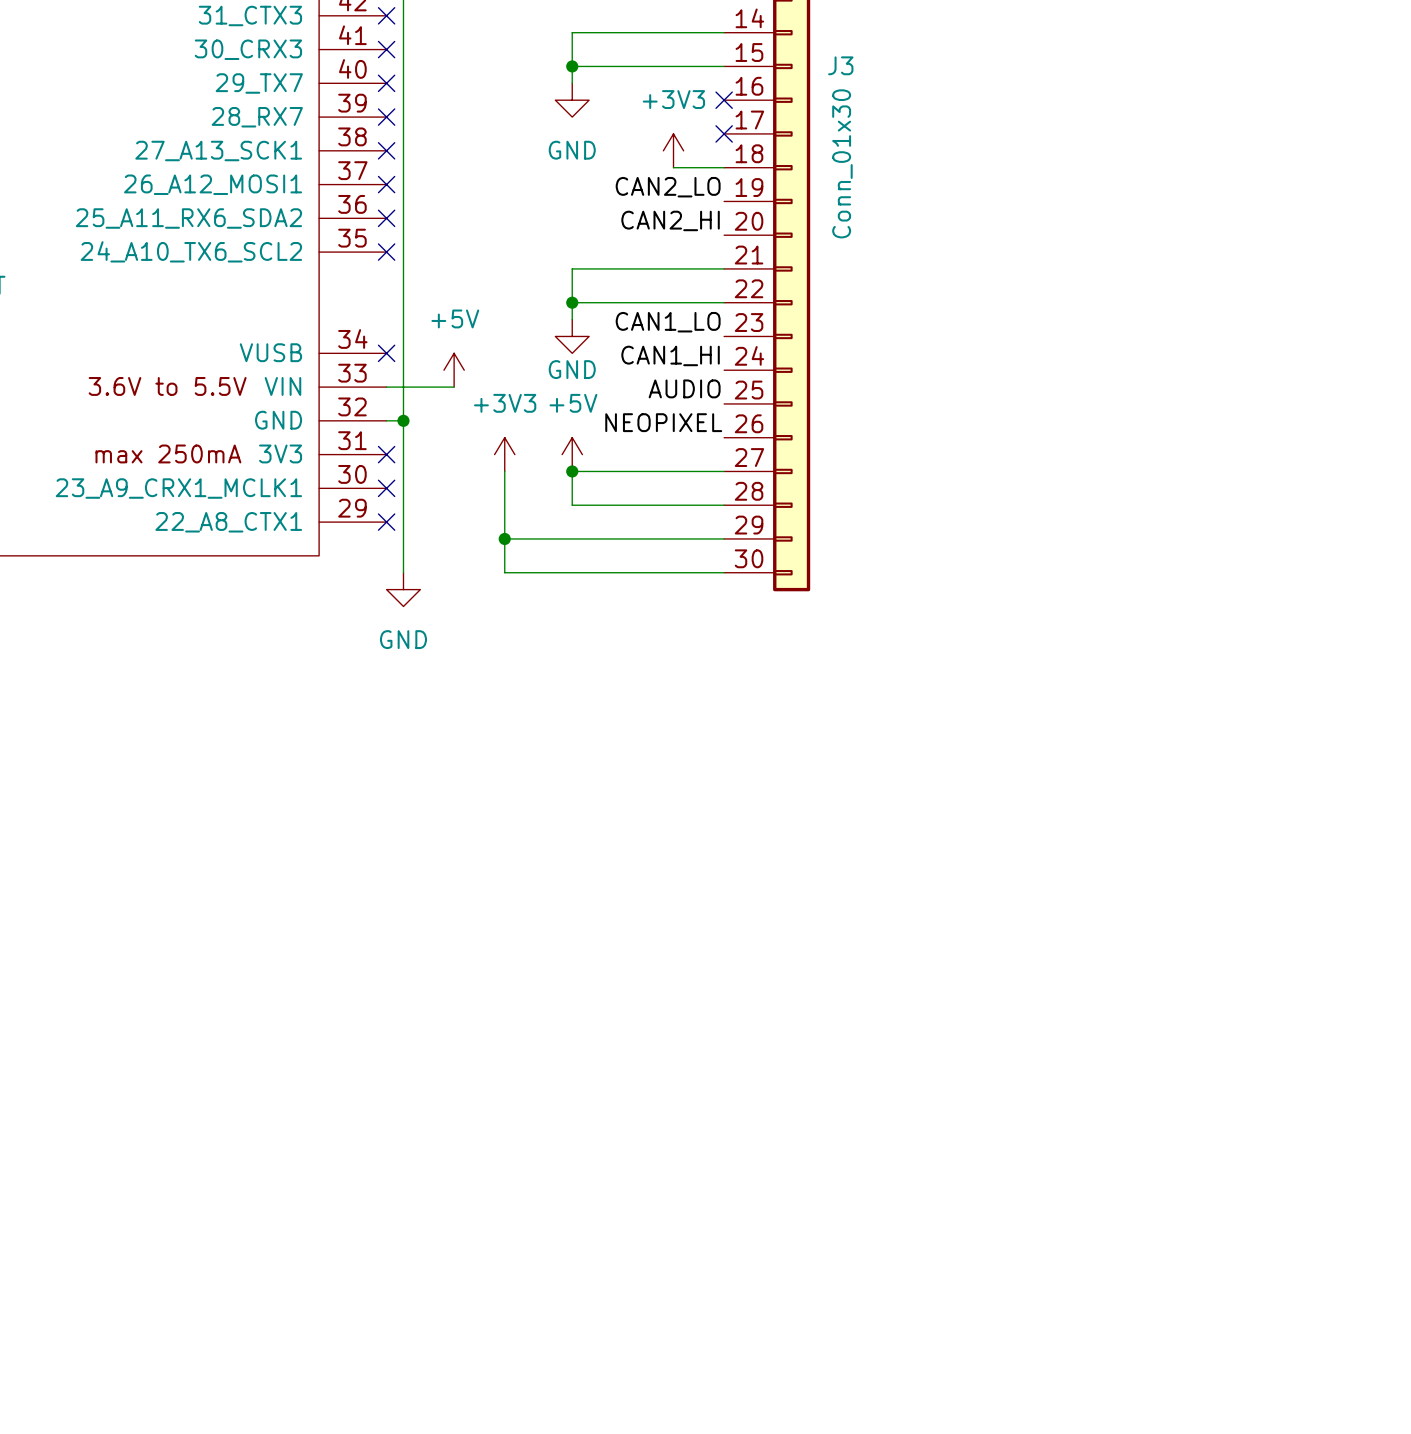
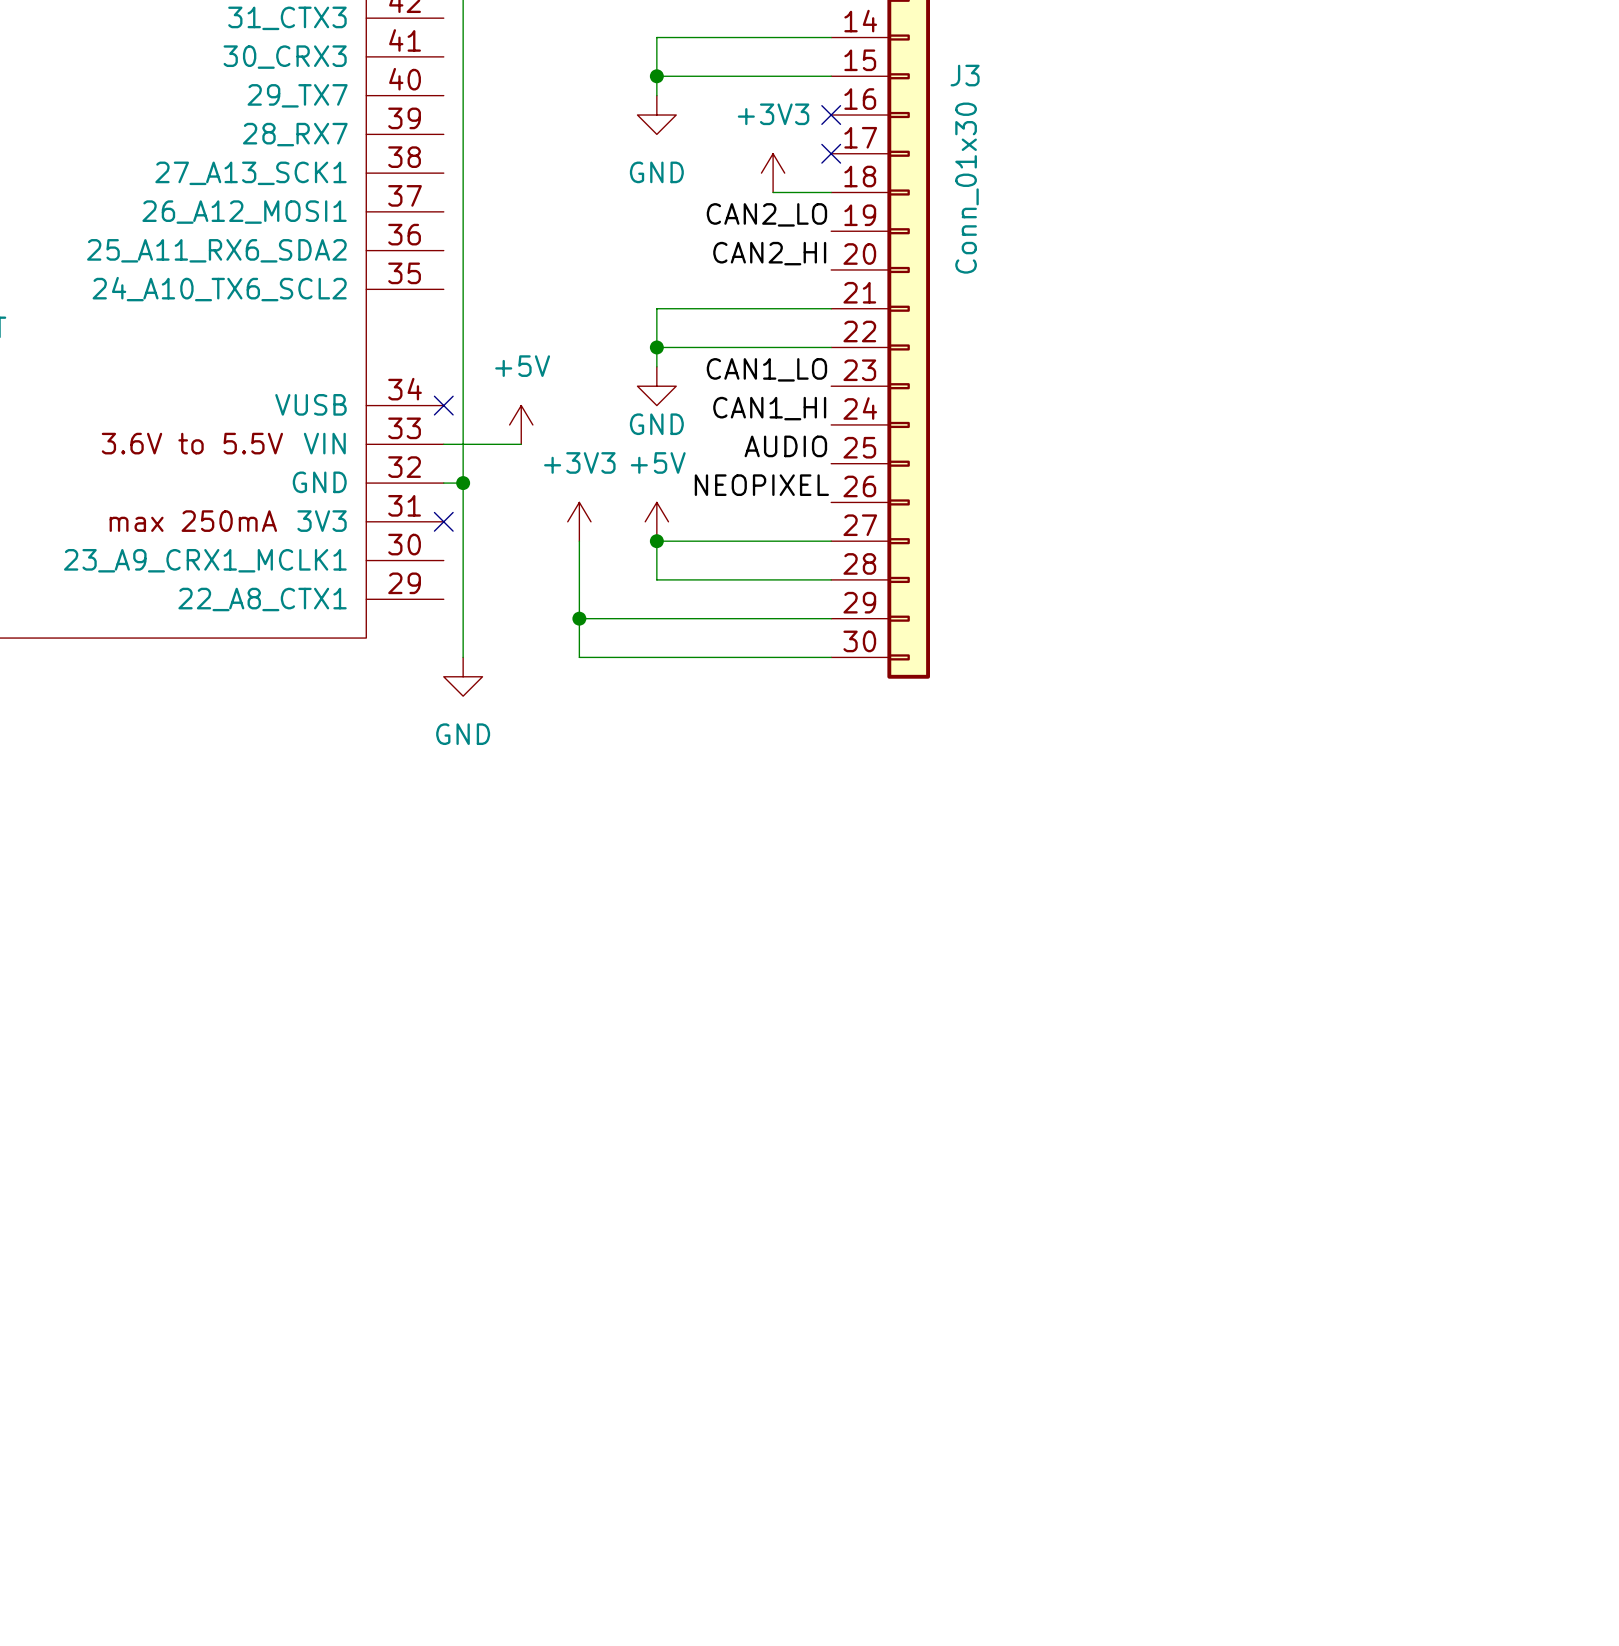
no-connect mark: (386, 15) -> none
no-connect mark: (386, 49) -> none
no-connect mark: (386, 83) -> none
no-connect mark: (386, 117) -> none
no-connect mark: (386, 150) -> none
no-connect mark: (386, 184) -> none
no-connect mark: (386, 218) -> none
no-connect mark: (386, 252) -> none
no-connect mark: (386, 488) -> none
no-connect mark: (386, 522) -> none

